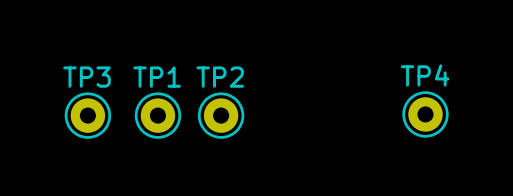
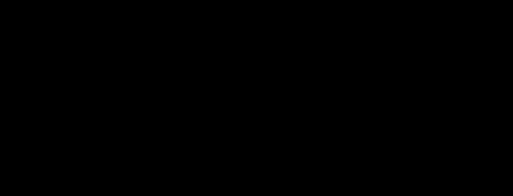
TP4: (425, 114) -> none
TP3: (87, 115) -> none
TP1: (157, 115) -> none
TP2: (221, 115) -> none

